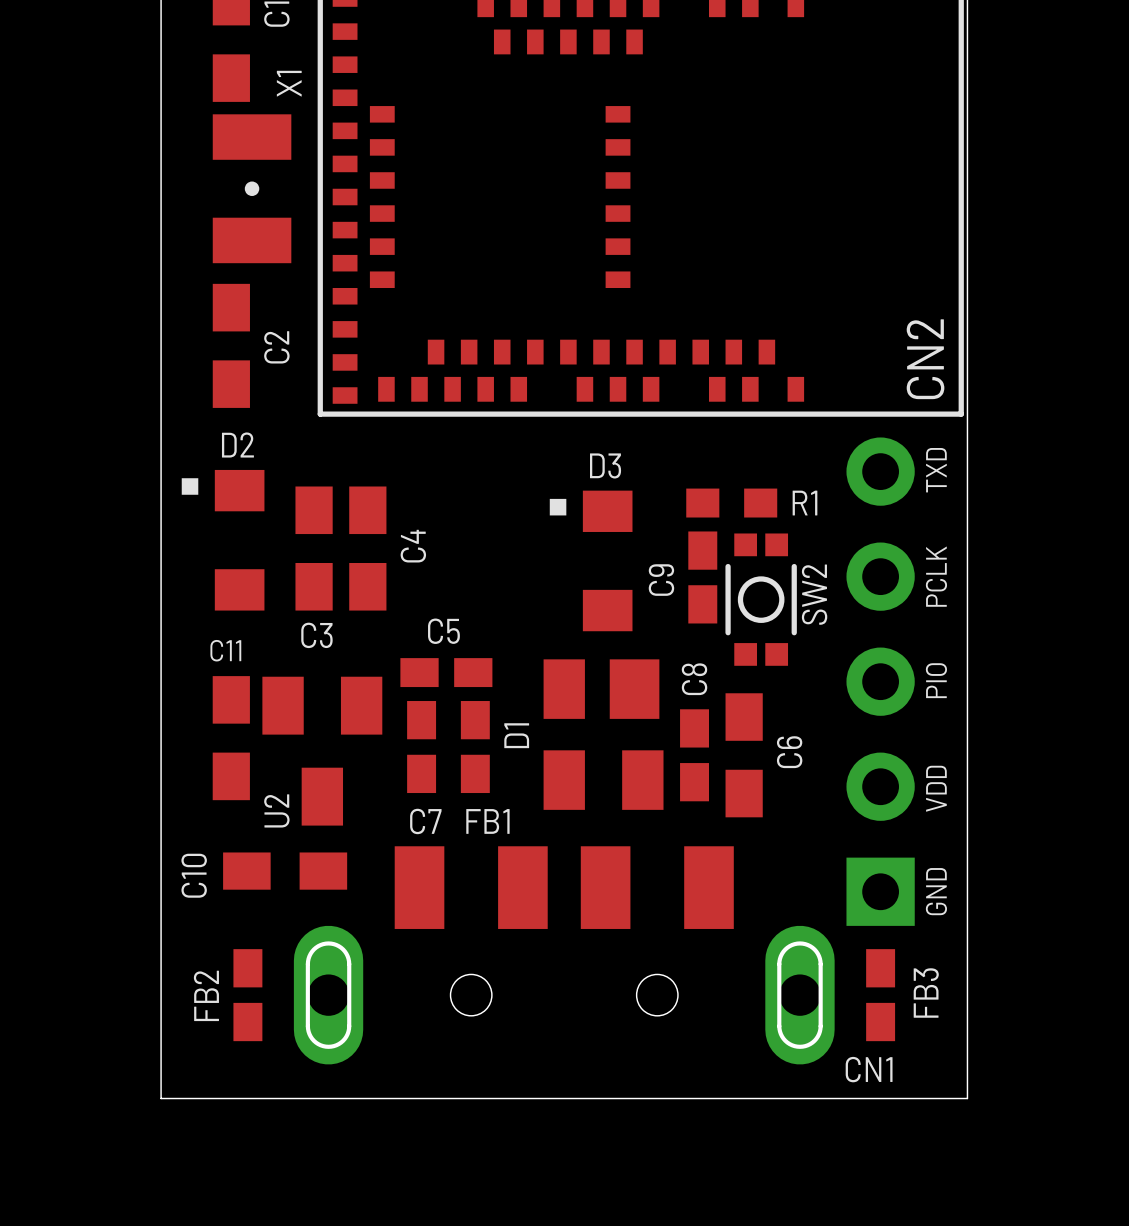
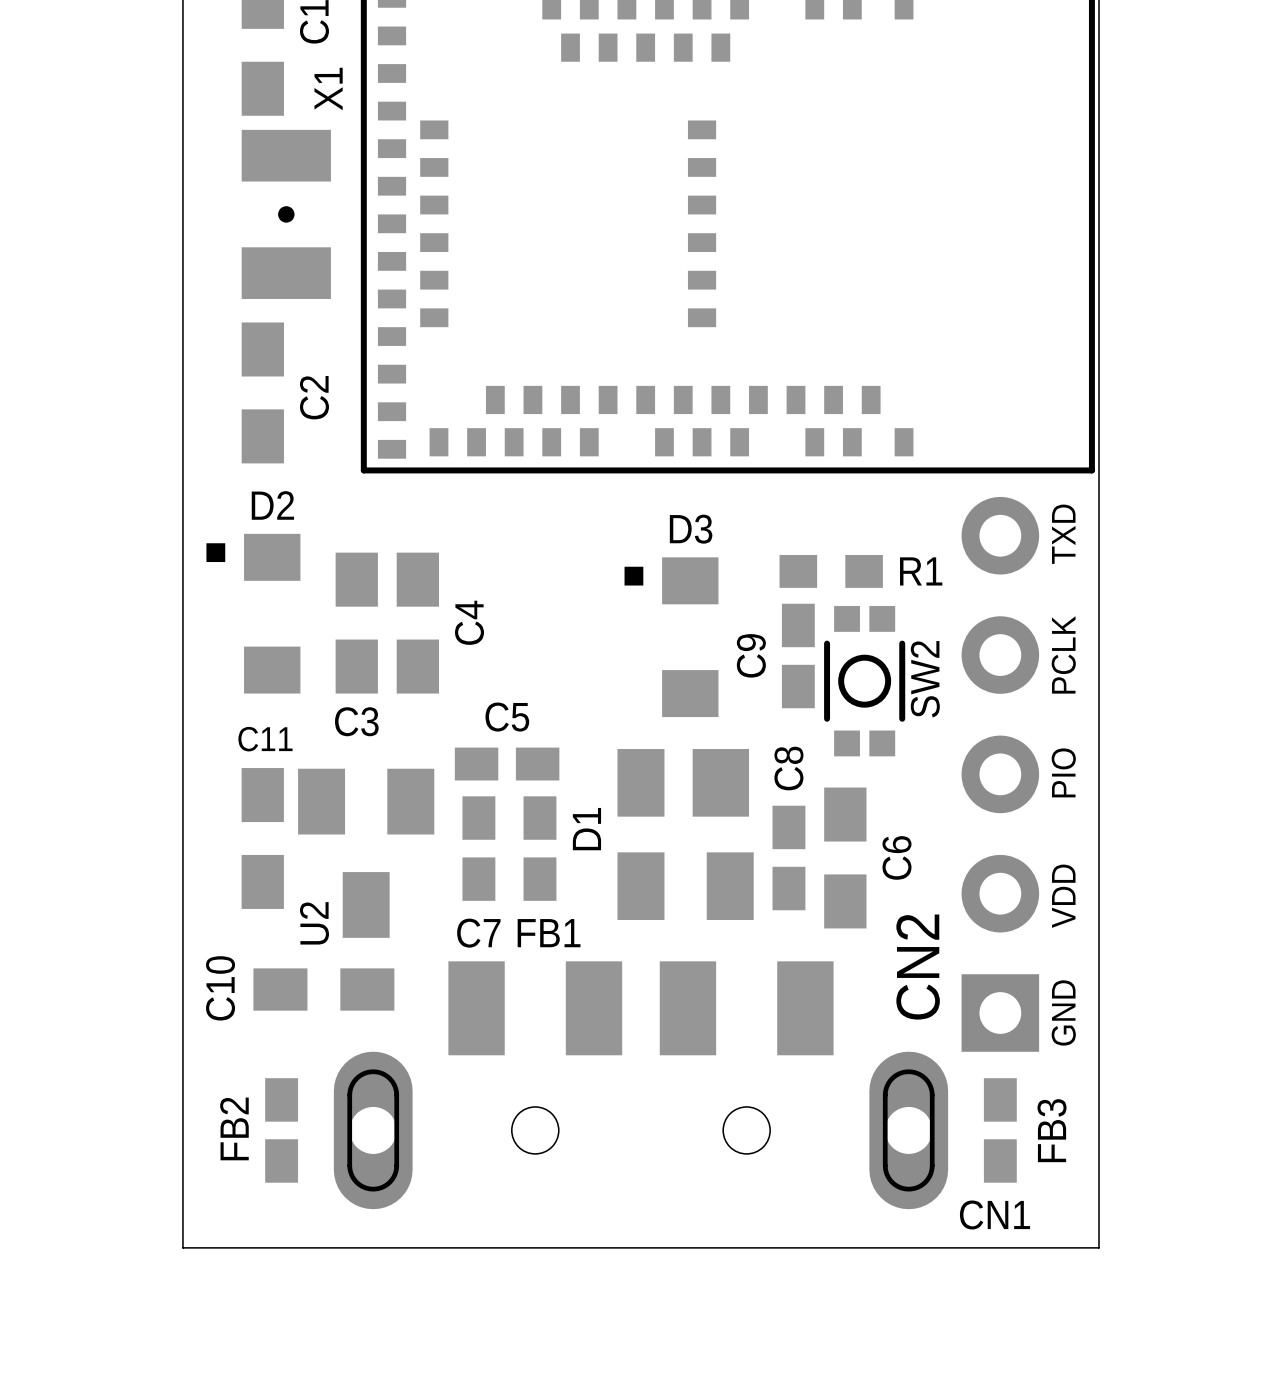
CN2 name position: CN2 (925, 359) -> CN2 (918, 967)

